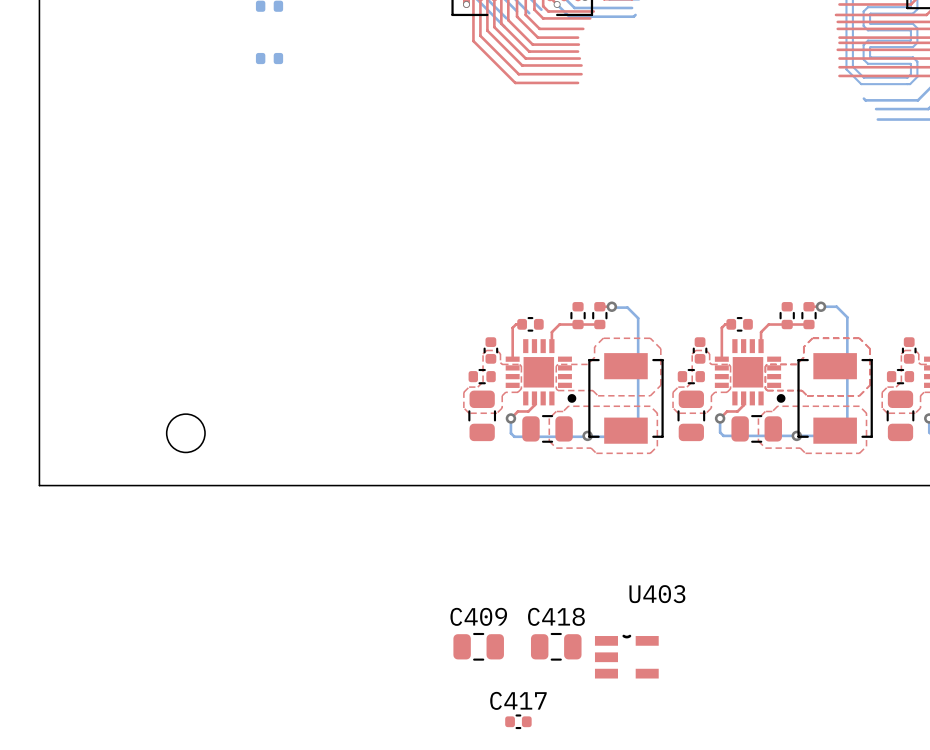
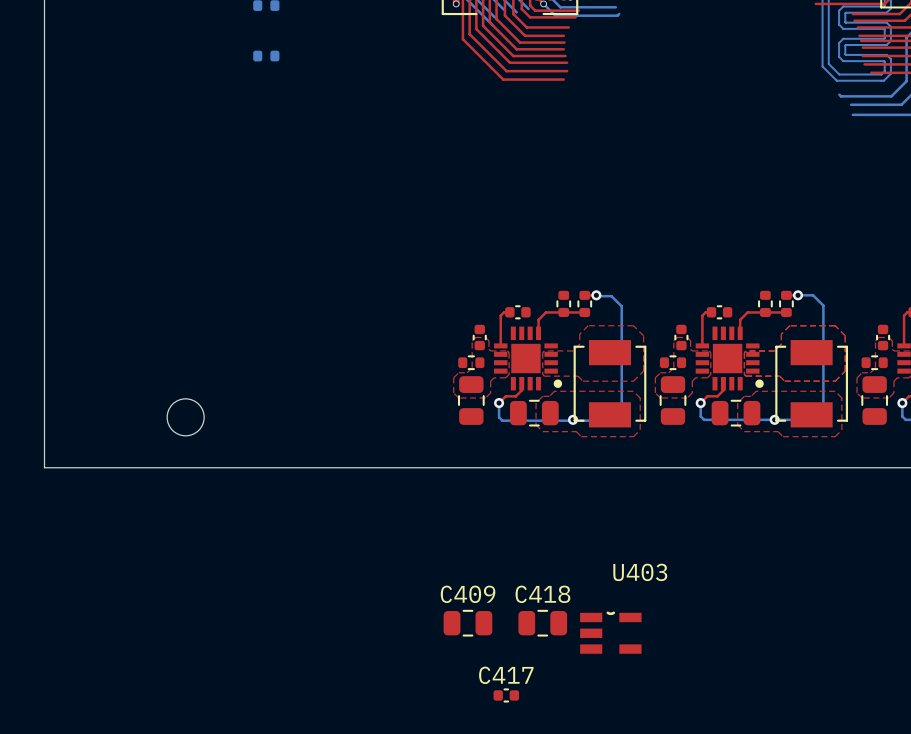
top track: (836, 14) (877, 14) -> none
top track: (837, 21) (879, 21) -> none
top track: (837, 28) (883, 28) -> none
top track: (839, 37) (884, 37) -> none
top track: (839, 42) (886, 42) -> none
top track: (837, 49) (888, 49) -> none
top track: (839, 58) (888, 58) -> none
top track: (839, 67) (890, 67) -> none
top track: (839, 75) (897, 75) -> none

